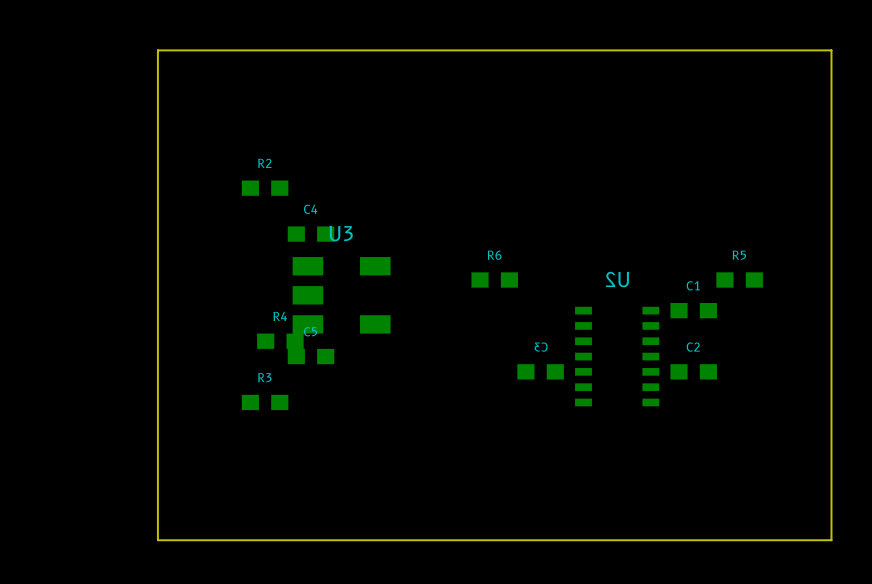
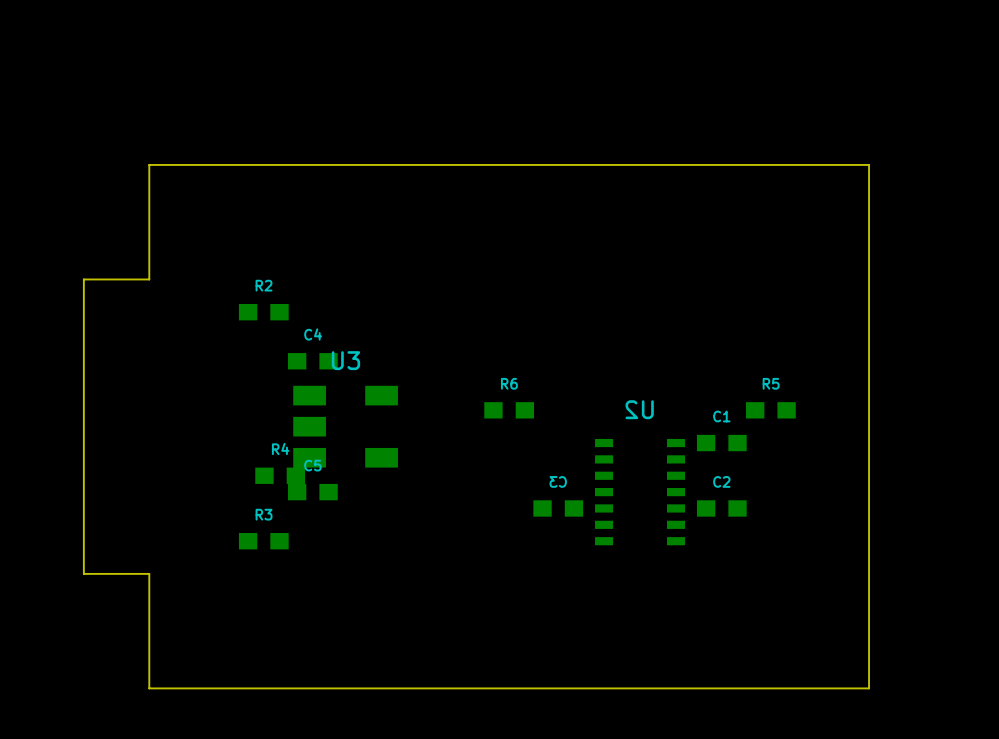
board edge: (157, 157) (157, 433) -> (149, 279) (83, 279) (83, 573) (149, 573)

